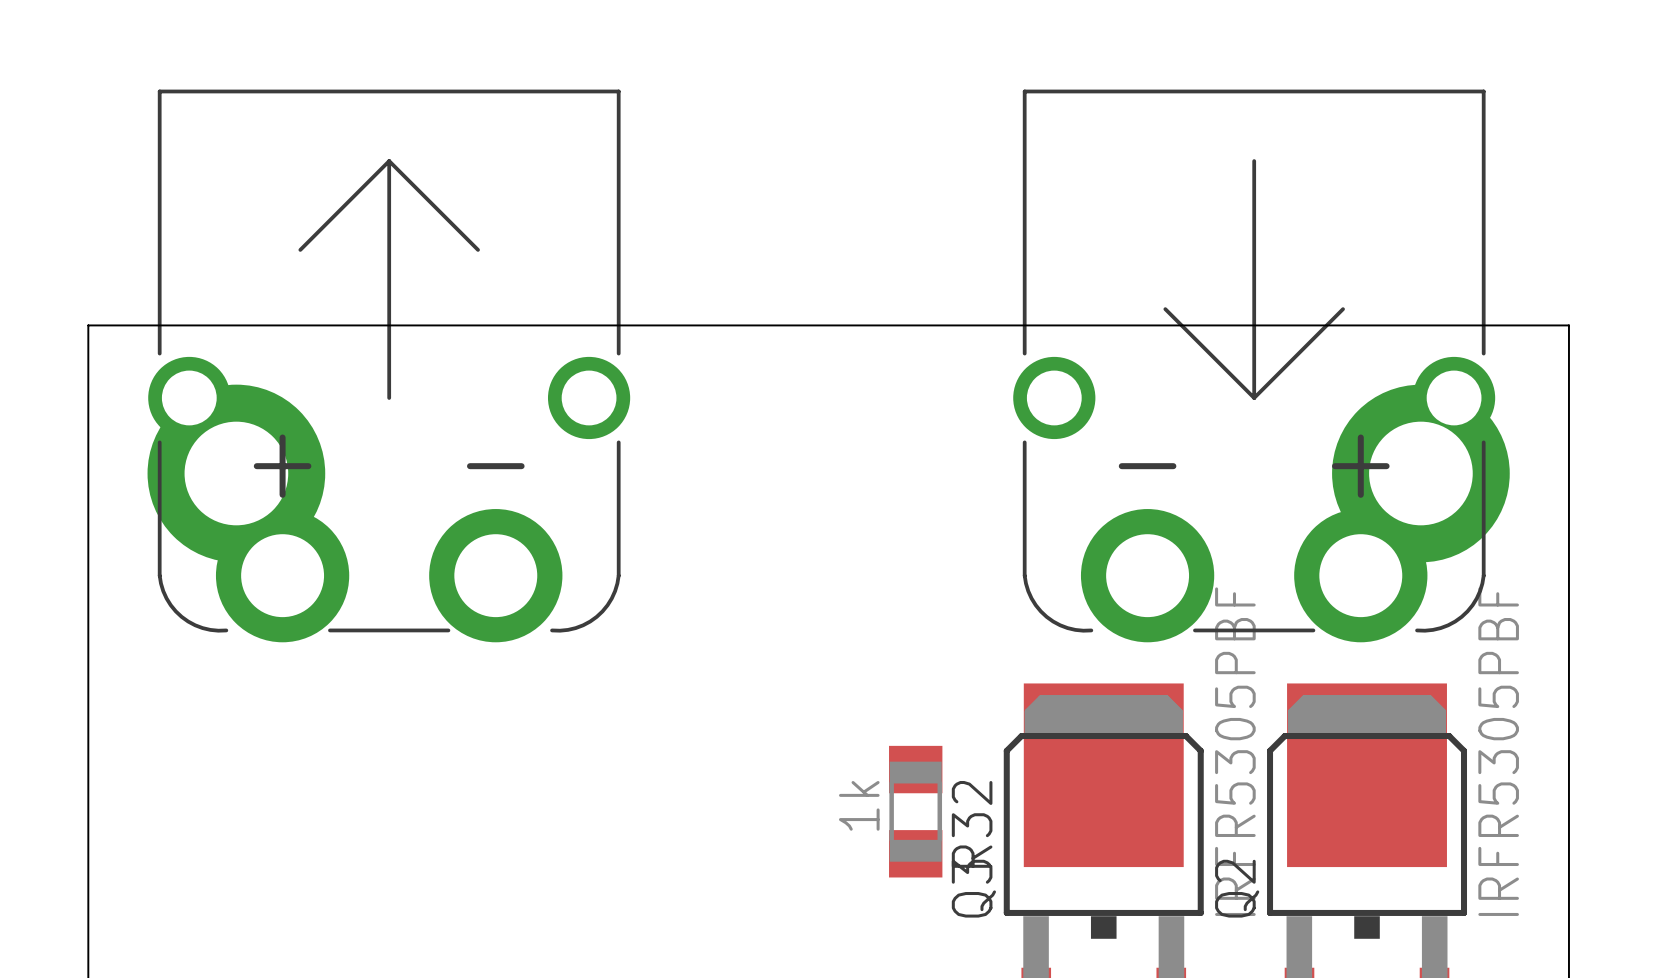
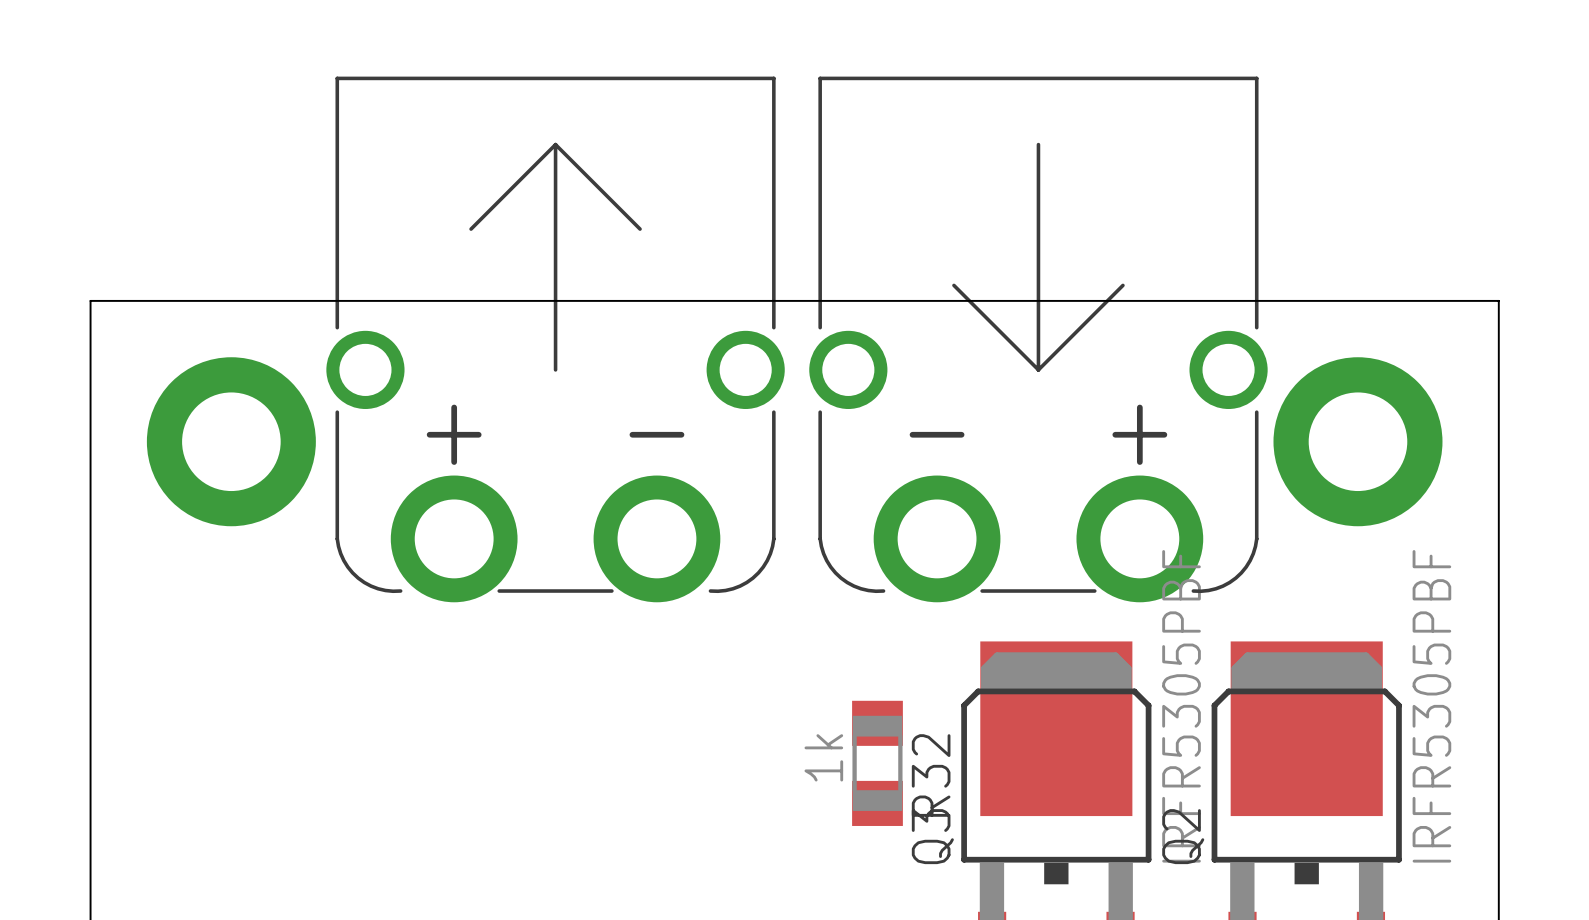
part position: (389, 365) -> (555, 339)
part position: (1254, 365) -> (1038, 339)

